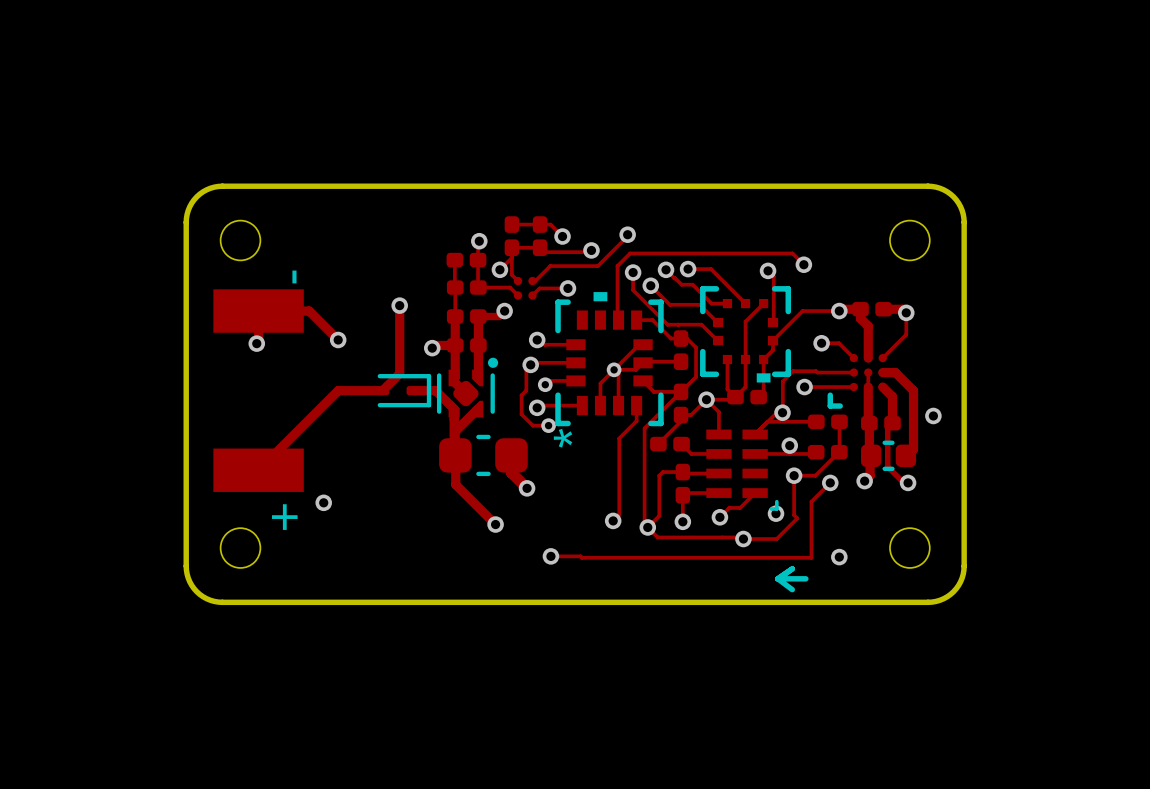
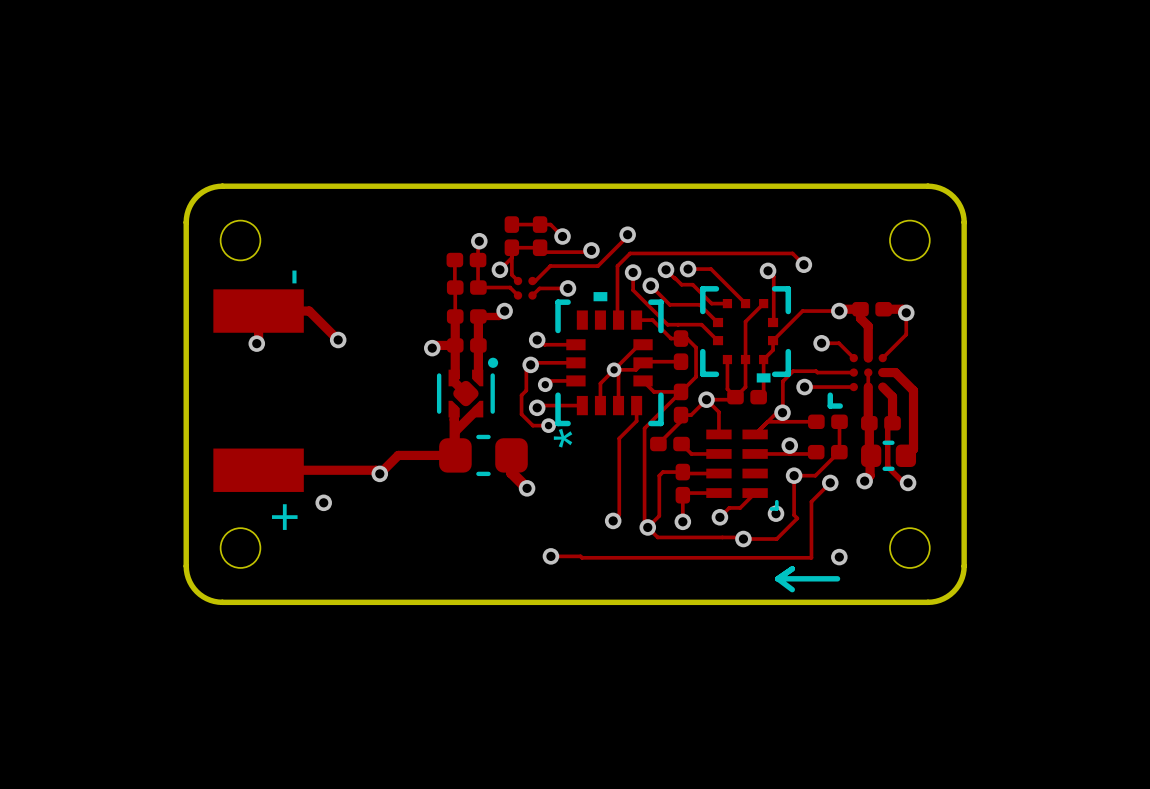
track: (399, 305) (399, 373) (382, 390) (338, 390) (258, 470) -> (455, 455) (398, 455) (379, 473) (376, 470) (258, 470)
via: (399, 305) -> none
part: (403, 390) -> none
track: (413, 390) (435, 390) (454, 409) -> none
via: (933, 415) -> none
track: (455, 443) (455, 484) (495, 524) -> none
via: none -> (379, 473)
via: (495, 524) -> none
line: none -> (805, 578) (837, 578)

